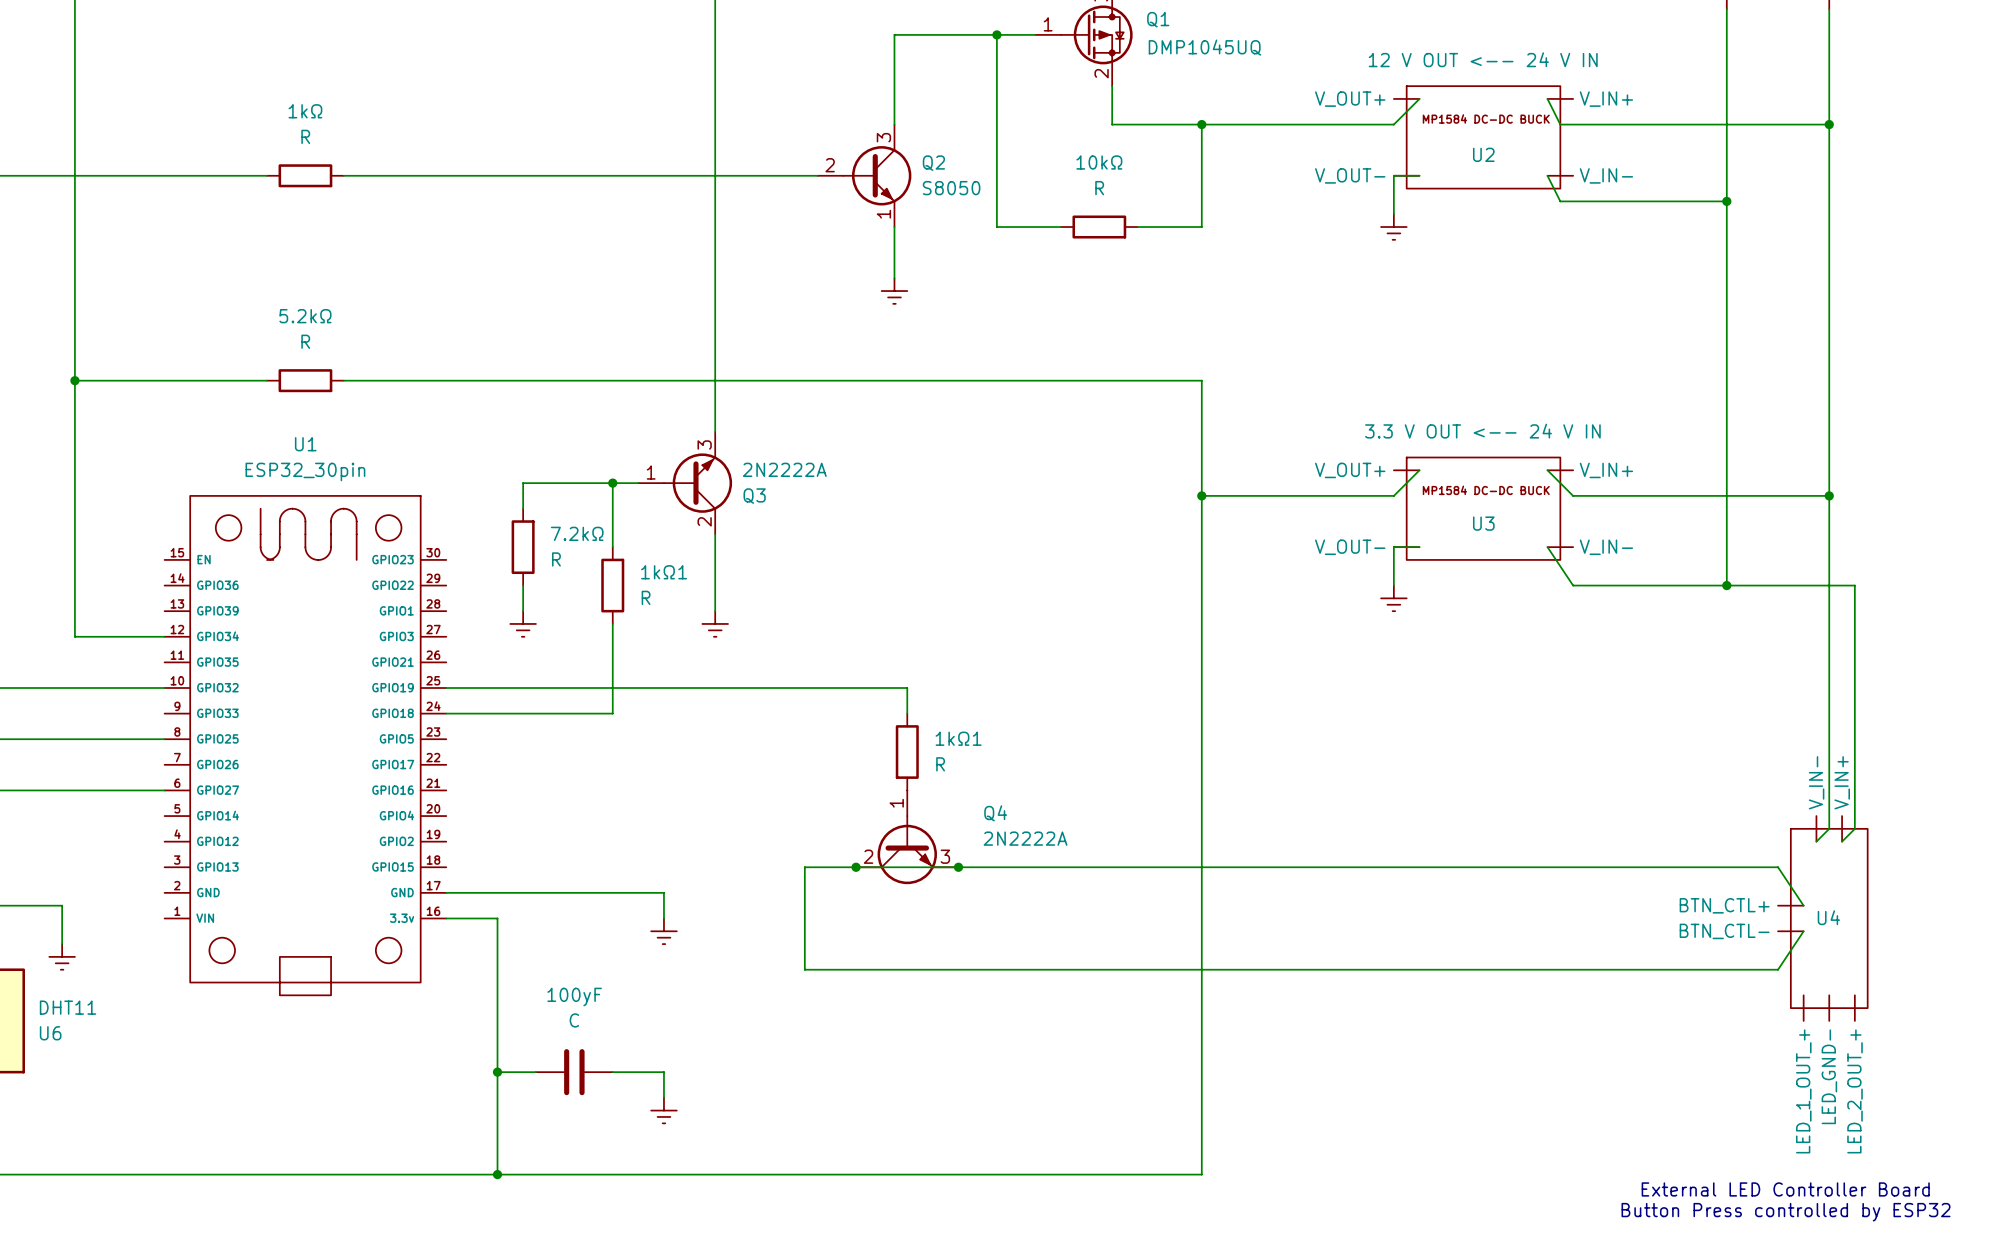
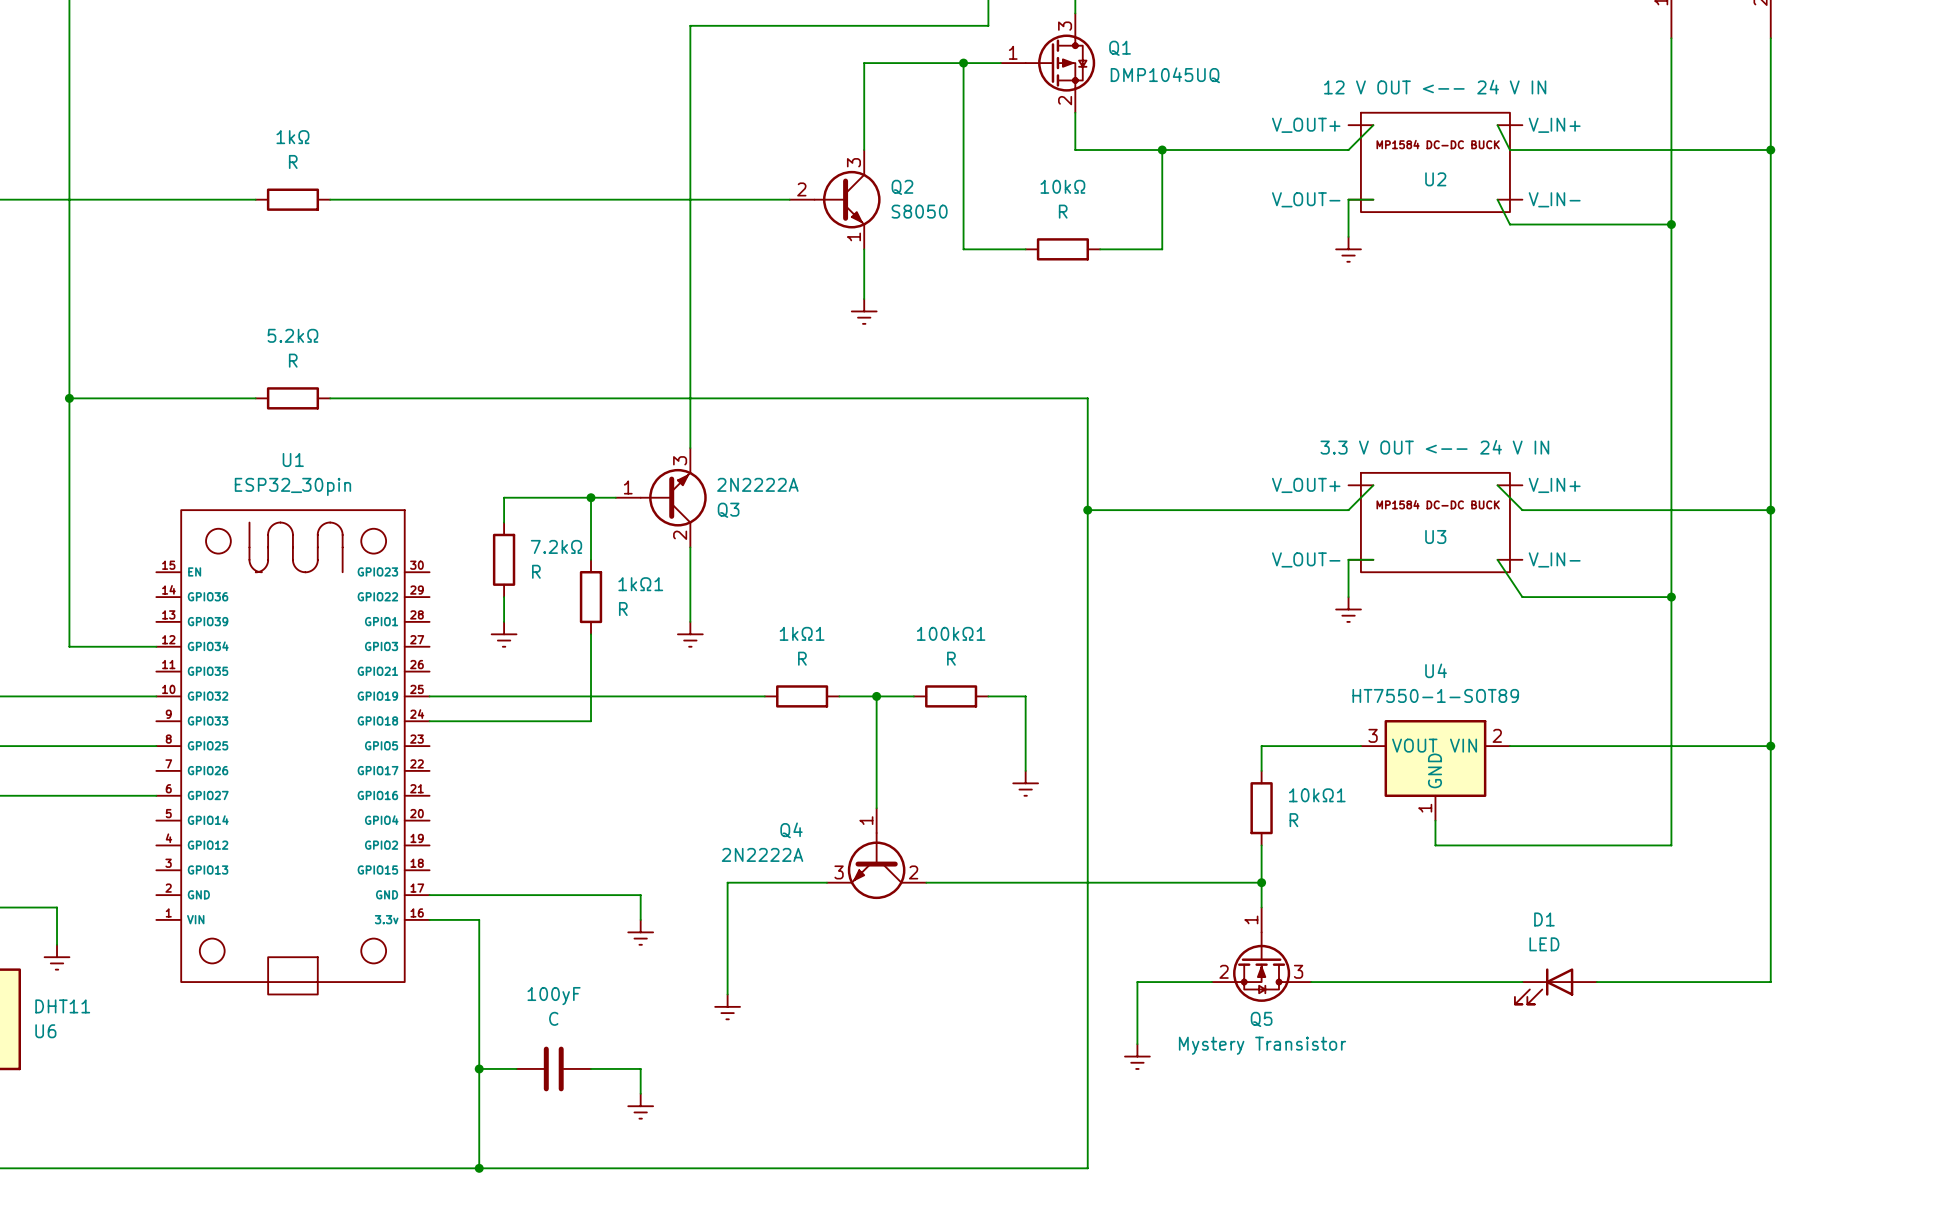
wire: (1124, 380) (1201, 380) (1201, 1174) (1124, 1174) -> (1087, 398) (1087, 1168)
wire: none -> (1087, 510) (1162, 510)
junction: none -> (1087, 510)
junction: (1201, 495) -> none
wire: (1726, 585) (1854, 585) (1854, 828) (1842, 841) -> (1671, 597) (1671, 845) (1435, 845) (1435, 820)
wire: (792, 687) (868, 687) -> none
wire: none -> (876, 696) (913, 696)
junction: none -> (876, 696)
100kΩ1: none -> R (951, 696)
wire: none -> (988, 696) (1025, 696) (1025, 770)
U4 value: none -> HT7550-1-SOT89 (1435, 695)
wire: none -> (876, 721) (876, 808)
1kΩ1 name position: 1kΩ1 (958, 738) -> 1kΩ1 (802, 633)
wire: none -> (1360, 746) (1261, 746) (1261, 770)
wire: none -> (1509, 746) (1770, 746)
junction: none -> (1770, 746)
1kΩ1 rotation: 0° (907, 752) -> 90° clockwise (802, 696)
1kΩ1 position: (907, 752) -> (802, 696)
1kΩ1 value position: R (940, 764) -> R (802, 658)
power symbol: none -> (1025, 783)
10kΩ1: none -> R (1261, 808)
U4 symbol: [1778, 816, 1868, 1021] -> [1360, 720, 1510, 821]
wire: (1829, 828) (1816, 841) -> (1770, 833) (1770, 982) (1596, 982)
wire: none -> (1261, 845) (1261, 907)
Q4 flip: as is (907, 850) -> left-right (876, 866)
junction: (856, 867) -> none
junction: (958, 867) -> none
wire: none -> (826, 882) (727, 882) (727, 994)
wire: none -> (926, 882) (1261, 882)
junction: none -> (1261, 882)
wire: (1803, 905) (1778, 867) (804, 867) (804, 969) (1778, 969) (1803, 931) -> none
U4 name position: U4 (1828, 917) -> U4 (1436, 670)
Q5: none -> Mystery Transistor (1261, 954)
wire: none -> (1211, 982) (1137, 982) (1137, 1044)
wire: none -> (1311, 982) (1522, 982)
D1: none -> LED (1555, 986)
power symbol: none -> (727, 1006)
power symbol: none -> (1137, 1056)
text: External LED Controller Board (1785, 1189) -> none
text: Button Press controlled by ESP32 (1786, 1212) -> none

